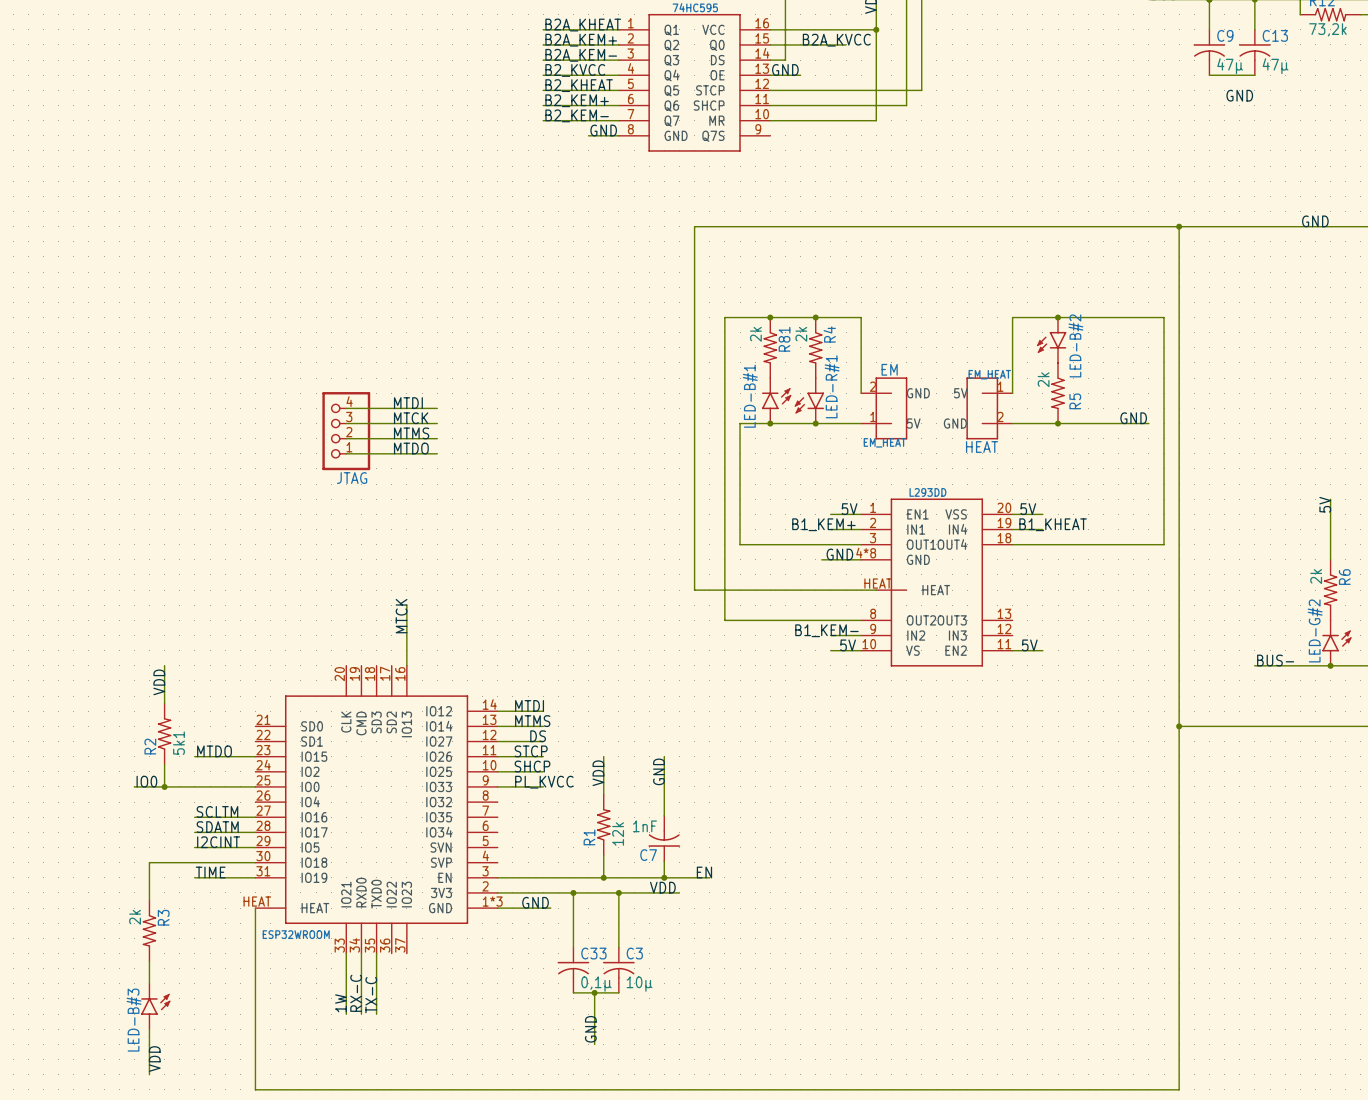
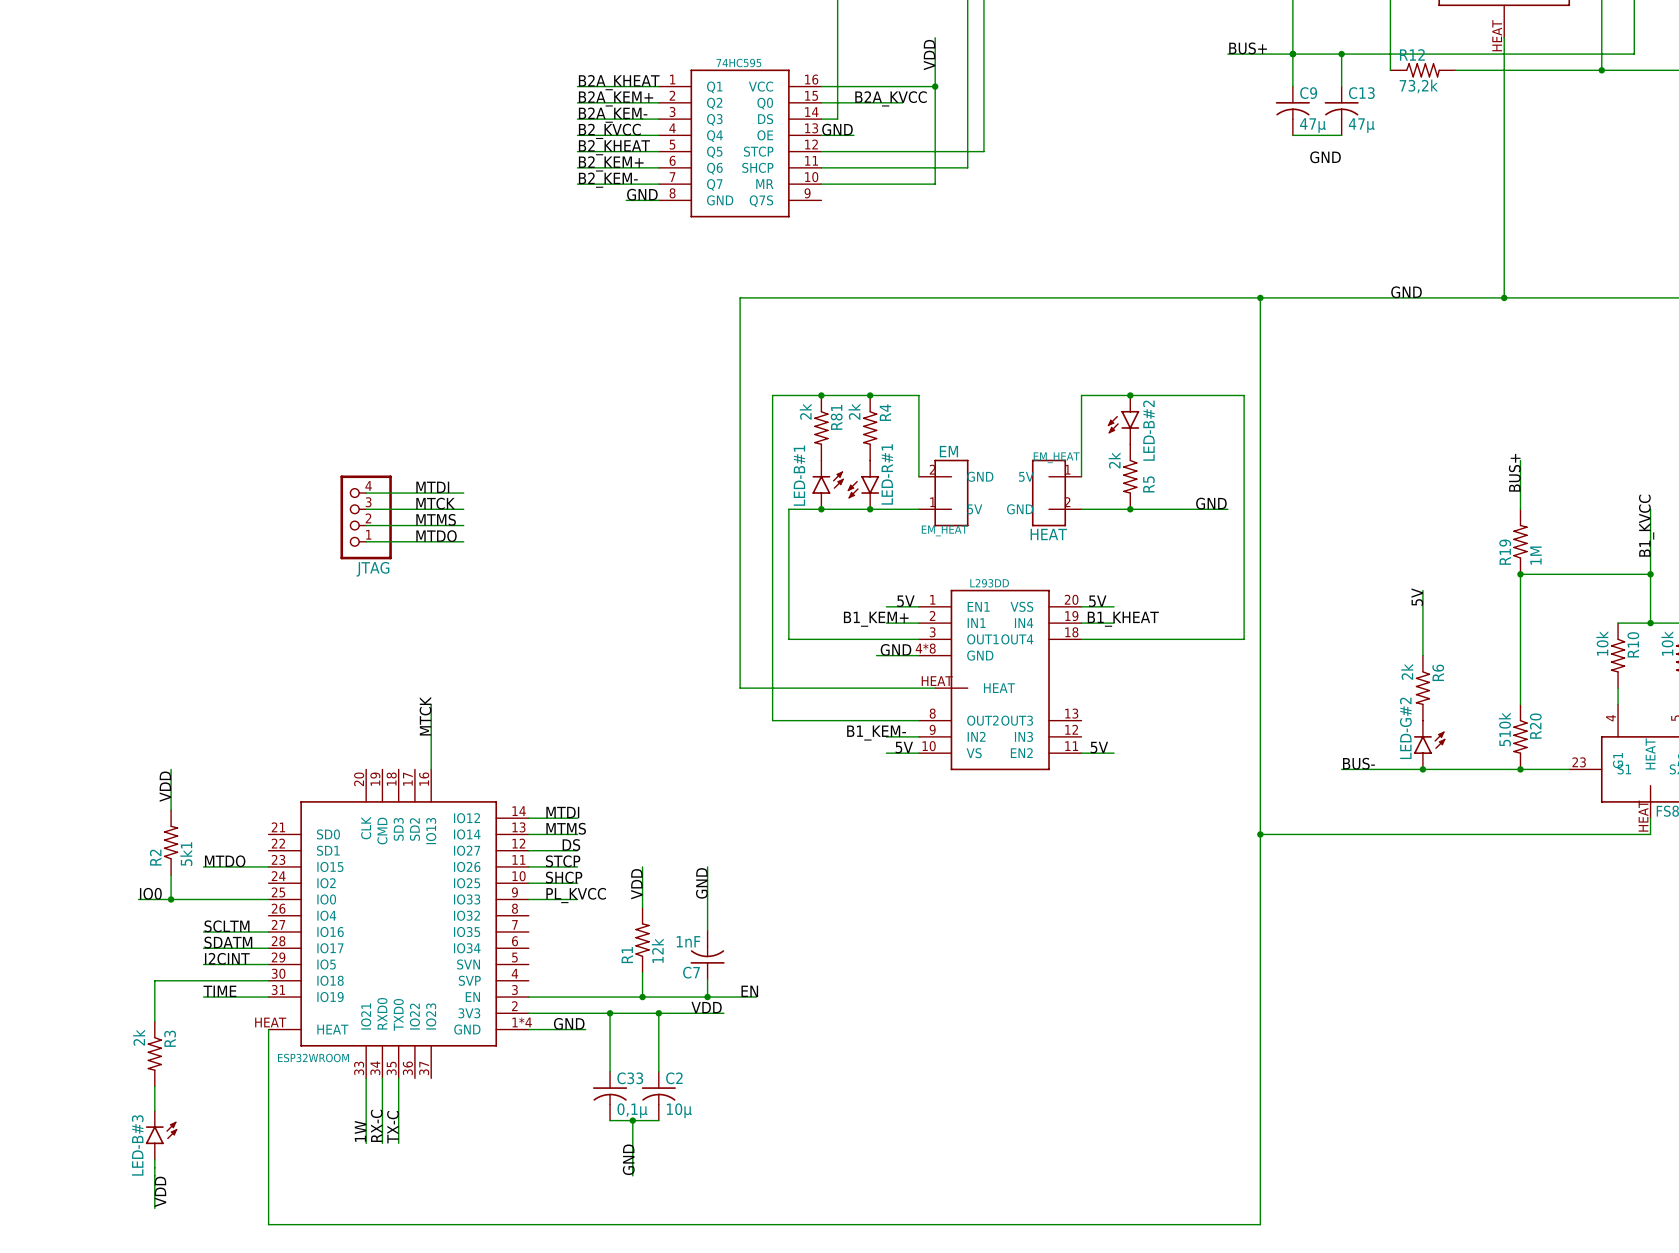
part pin number: 1*3 (492, 901) -> 1*4 (522, 1022)
C3 name: C3 (634, 953) -> C2 (674, 1078)

